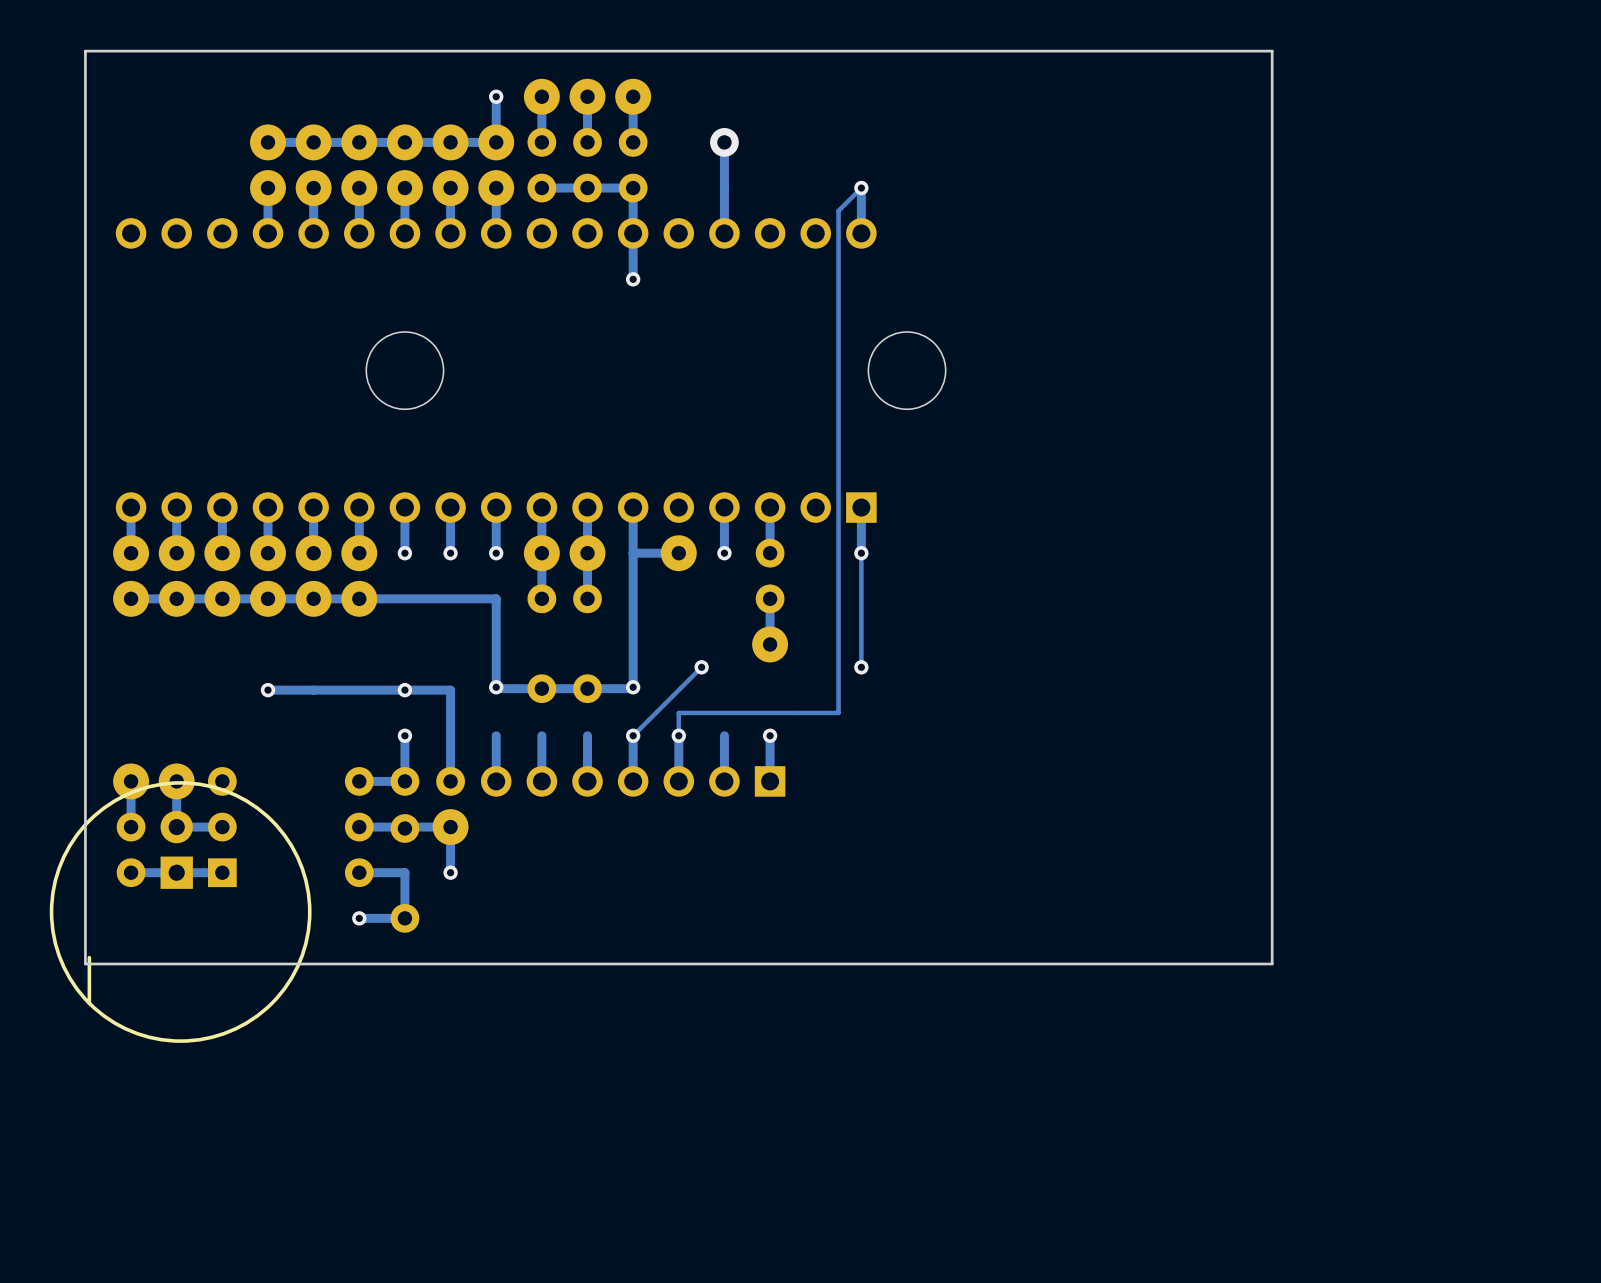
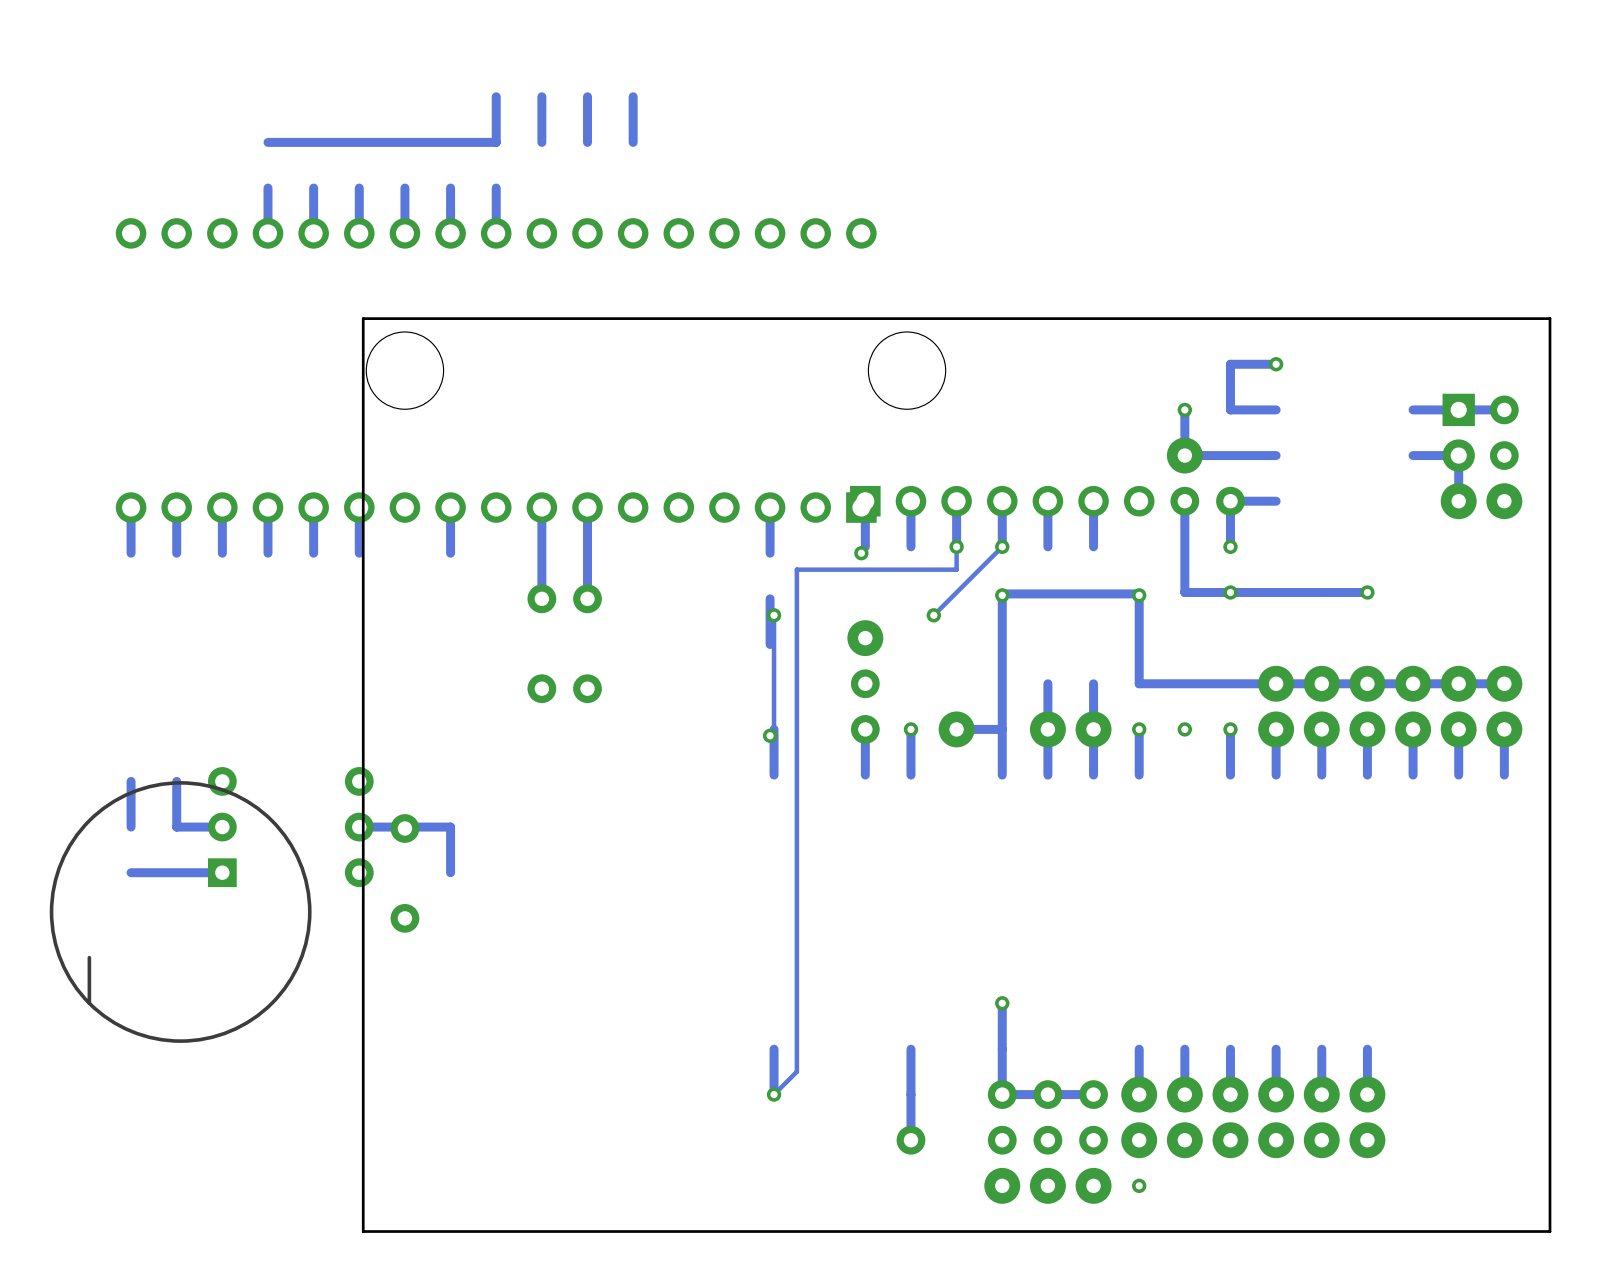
board edge: (1272, 51) (85, 51) (85, 964) (1272, 964) (1272, 51) -> (1550, 318) (363, 318) (363, 1231) (1550, 1231) (1550, 318)
via: (496, 96) -> none
part: (541, 96) -> none
part: (587, 96) -> none
part: (633, 96) -> none
part: (268, 142) -> none
part: (313, 142) -> none
part: (359, 142) -> none
part: (404, 142) -> none
part: (450, 142) -> none
part: (496, 142) -> none
track: (724, 142) (724, 233) -> none
via: (724, 142) -> none
part: (541, 165) -> none
part: (587, 165) -> none
part: (633, 165) -> none
part: (268, 188) -> none
part: (313, 188) -> none
part: (359, 188) -> none
part: (404, 188) -> none
part: (450, 188) -> none
part: (496, 188) -> none
track: (541, 188) (633, 188) (633, 279) -> none
via: (861, 188) -> none
track: (861, 233) (861, 188) (838, 210) (838, 712) (678, 712) (678, 781) -> none
via: (633, 279) -> none
track: none -> (1276, 364) (1230, 364) (1230, 409) (1276, 409)
via: none -> (1276, 364)
track: none -> (1184, 409) (1184, 455) (1276, 455)
via: none -> (1184, 409)
track: none -> (1504, 409) (1413, 409)
part: none -> (1458, 432)
part: none -> (1504, 432)
part: none -> (1184, 455)
track: none -> (1413, 455) (1458, 455) (1458, 501)
track: none -> (956, 501) (956, 569) (796, 569) (796, 1071) (774, 1094) (774, 1049)
track: none -> (1002, 501) (1002, 546) (933, 615)
part: none -> (1002, 501)
track: none -> (1184, 501) (1184, 592) (1367, 592)
part: none -> (1207, 501)
track: none -> (1276, 501) (1230, 501) (1230, 546)
part: none -> (1458, 501)
part: none -> (1504, 501)
track: (404, 507) (404, 553) -> none
track: (496, 507) (496, 553) -> (865, 501) (865, 546)
track: (633, 507) (631, 688) (497, 688) (496, 598) (131, 598) -> none
track: (724, 507) (724, 553) -> (1093, 501) (1093, 546)
track: (861, 507) (861, 667) -> none
via: none -> (956, 546)
via: none -> (1002, 546)
via: none -> (1230, 546)
part: (131, 553) -> none
part: (176, 553) -> none
part: (222, 553) -> none
part: (268, 553) -> none
part: (313, 553) -> none
part: (359, 553) -> none
via: (404, 553) -> none
via: (450, 553) -> none
via: (496, 553) -> none
part: (541, 553) -> none
part: (587, 553) -> none
track: (678, 553) (633, 553) -> (1002, 729) (956, 729)
part: (678, 553) -> none
via: (724, 553) -> none
part position: (770, 576) -> (865, 706)
via: none -> (1230, 592)
via: none -> (1367, 592)
via: none -> (1002, 595)
via: none -> (1139, 595)
part: (131, 598) -> none
part: (176, 598) -> none
part: (222, 598) -> none
part: (268, 598) -> none
part: (313, 598) -> none
part: (359, 598) -> none
track: none -> (774, 615) (774, 775)
via: none -> (774, 615)
via: none -> (933, 615)
part position: (770, 644) -> (865, 638)
track: (701, 667) (633, 735) (633, 781) -> none
via: (701, 667) -> none
via: (861, 667) -> none
track: none -> (1047, 683) (1047, 775)
track: none -> (1093, 683) (1093, 775)
part: none -> (1276, 683)
part: none -> (1321, 683)
part: none -> (1367, 683)
part: none -> (1413, 683)
part: none -> (1458, 683)
track: none -> (1504, 683) (1139, 683) (1137, 593) (1003, 593) (1002, 775)
part: none -> (1504, 683)
via: (496, 687) -> none
via: (633, 687) -> none
track: (268, 690) (450, 690) (450, 781) -> none
via: (268, 690) -> none
via: (404, 690) -> none
via: none -> (910, 729)
part: none -> (956, 729)
part: none -> (1047, 729)
part: none -> (1093, 729)
via: none -> (1139, 729)
via: none -> (1184, 729)
track: none -> (1230, 729) (1230, 775)
via: none -> (1230, 729)
track: none -> (1276, 729) (1276, 775)
part: none -> (1276, 729)
track: none -> (1321, 729) (1321, 775)
part: none -> (1321, 729)
track: none -> (1367, 729) (1367, 775)
part: none -> (1367, 729)
track: none -> (1413, 729) (1413, 775)
part: none -> (1413, 729)
track: none -> (1458, 729) (1458, 775)
part: none -> (1458, 729)
track: none -> (1504, 729) (1504, 775)
part: none -> (1504, 729)
track: (404, 735) (404, 781) (359, 781) -> none
via: (404, 735) -> none
track: (496, 735) (496, 781) -> (865, 729) (865, 775)
track: (541, 735) (541, 781) -> (910, 729) (910, 775)
track: (587, 735) (587, 781) -> (910, 501) (910, 546)
via: (633, 735) -> none
via: (678, 735) -> none
track: (724, 735) (724, 781) -> (1047, 501) (1047, 546)
track: (770, 735) (770, 781) -> (1139, 729) (1139, 775)
part: (131, 781) -> none
part: (176, 781) -> none
part: (427, 781) -> none
part: (633, 781) -> none
part: (450, 827) -> none
part: (131, 849) -> none
part: (176, 849) -> none
track: (359, 872) (404, 872) (404, 918) (359, 918) -> none
via: (450, 872) -> none
via: (359, 918) -> none
track: none -> (1002, 1003) (1002, 1094) (1093, 1094)
via: none -> (1002, 1003)
track: none -> (910, 1049) (910, 1140)
track: none -> (1139, 1049) (1139, 1094)
track: none -> (1184, 1049) (1184, 1094)
track: none -> (1230, 1049) (1230, 1094)
track: none -> (1276, 1049) (1276, 1094)
track: none -> (1321, 1049) (1321, 1094)
track: none -> (1367, 1049) (1367, 1094)
via: none -> (774, 1094)
part: none -> (1139, 1094)
part: none -> (1184, 1094)
part: none -> (1230, 1094)
part: none -> (1276, 1094)
part: none -> (1321, 1094)
part: none -> (1367, 1094)
part: none -> (1002, 1117)
part: none -> (1047, 1117)
part: none -> (1093, 1117)
via: none -> (910, 1140)
part: none -> (1139, 1140)
part: none -> (1184, 1140)
part: none -> (1230, 1140)
part: none -> (1276, 1140)
part: none -> (1321, 1140)
part: none -> (1367, 1140)
part: none -> (1002, 1185)
part: none -> (1047, 1185)
part: none -> (1093, 1185)
via: none -> (1139, 1185)

